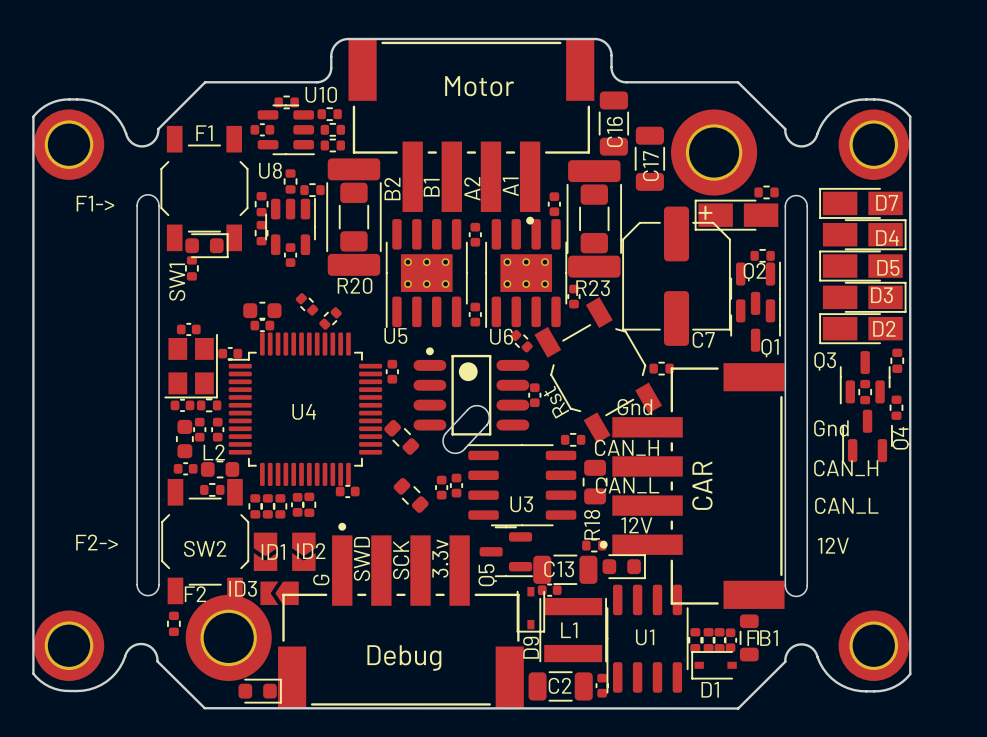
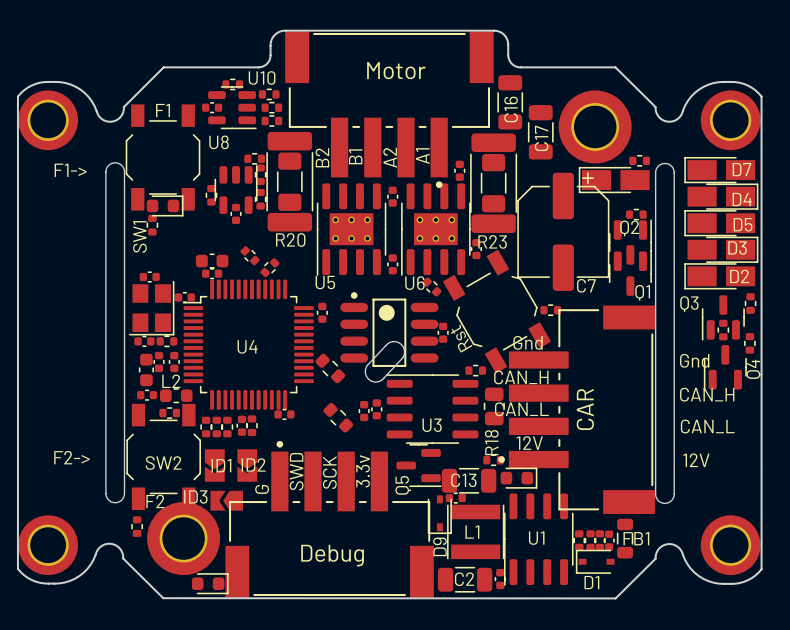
part: (290, 181) -> none
part: (261, 204) -> none
part: none -> (260, 174)
part: none -> (260, 199)

